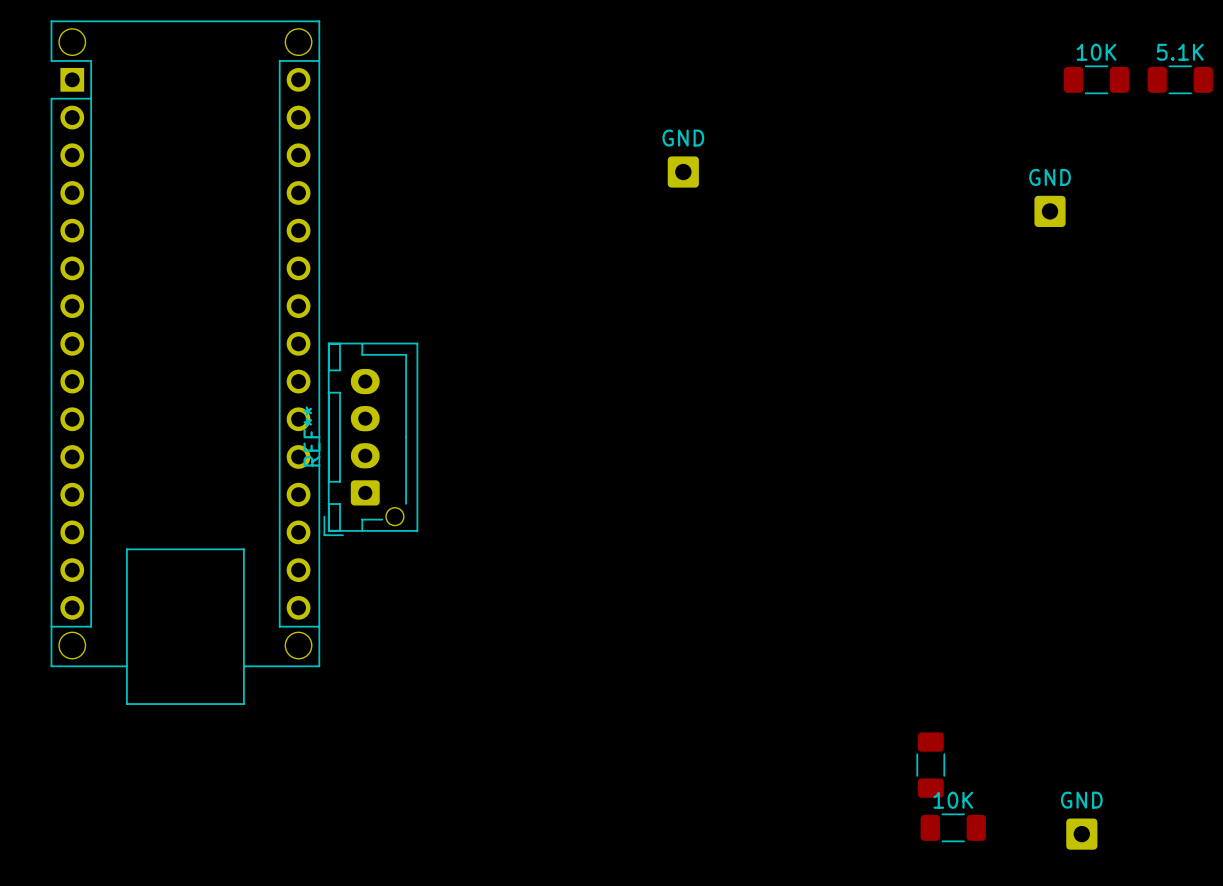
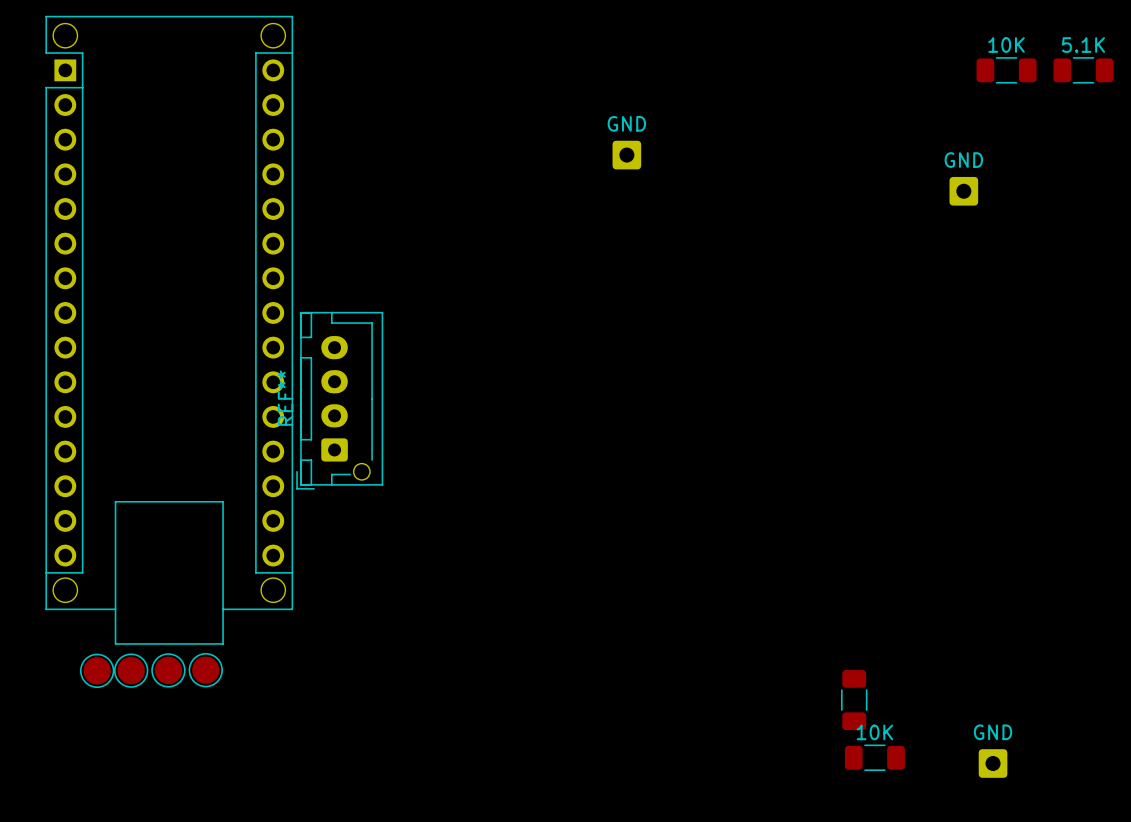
part: none -> (168, 670)
part: none -> (205, 670)
part: none -> (97, 670)
part: none -> (131, 670)

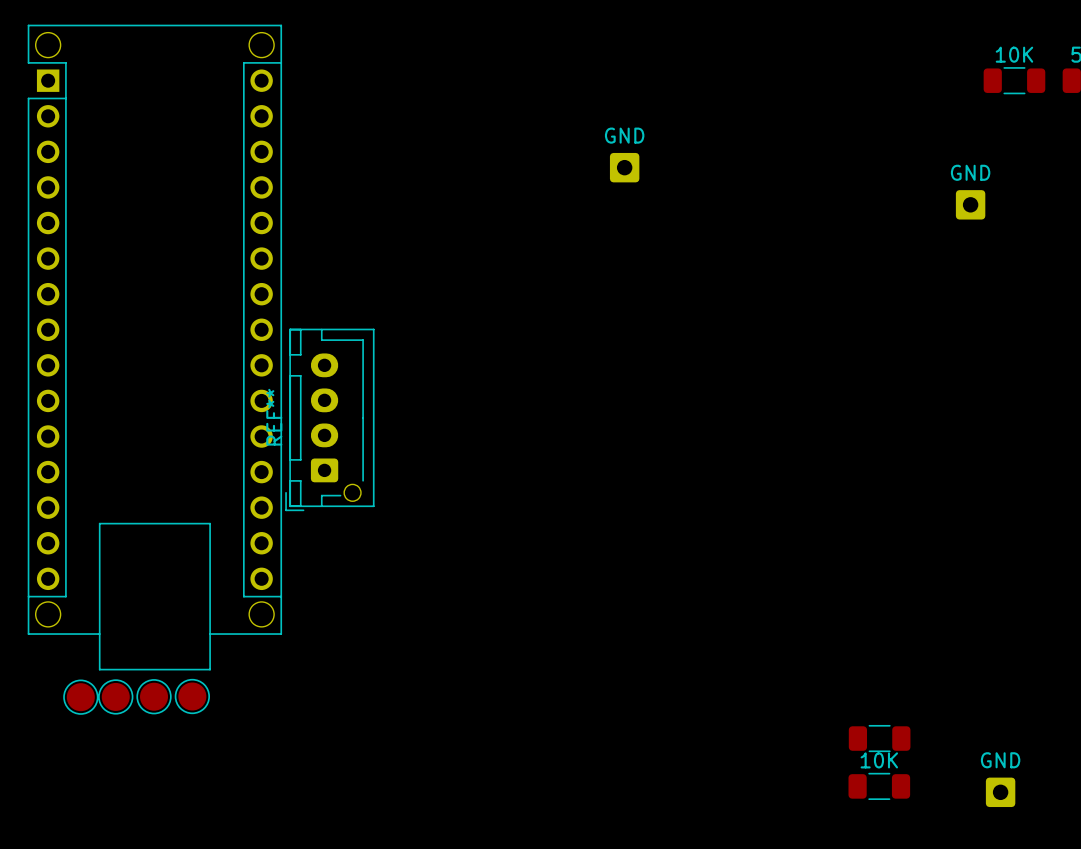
part rotation: 0° (854, 700) -> 90° clockwise (879, 738)

